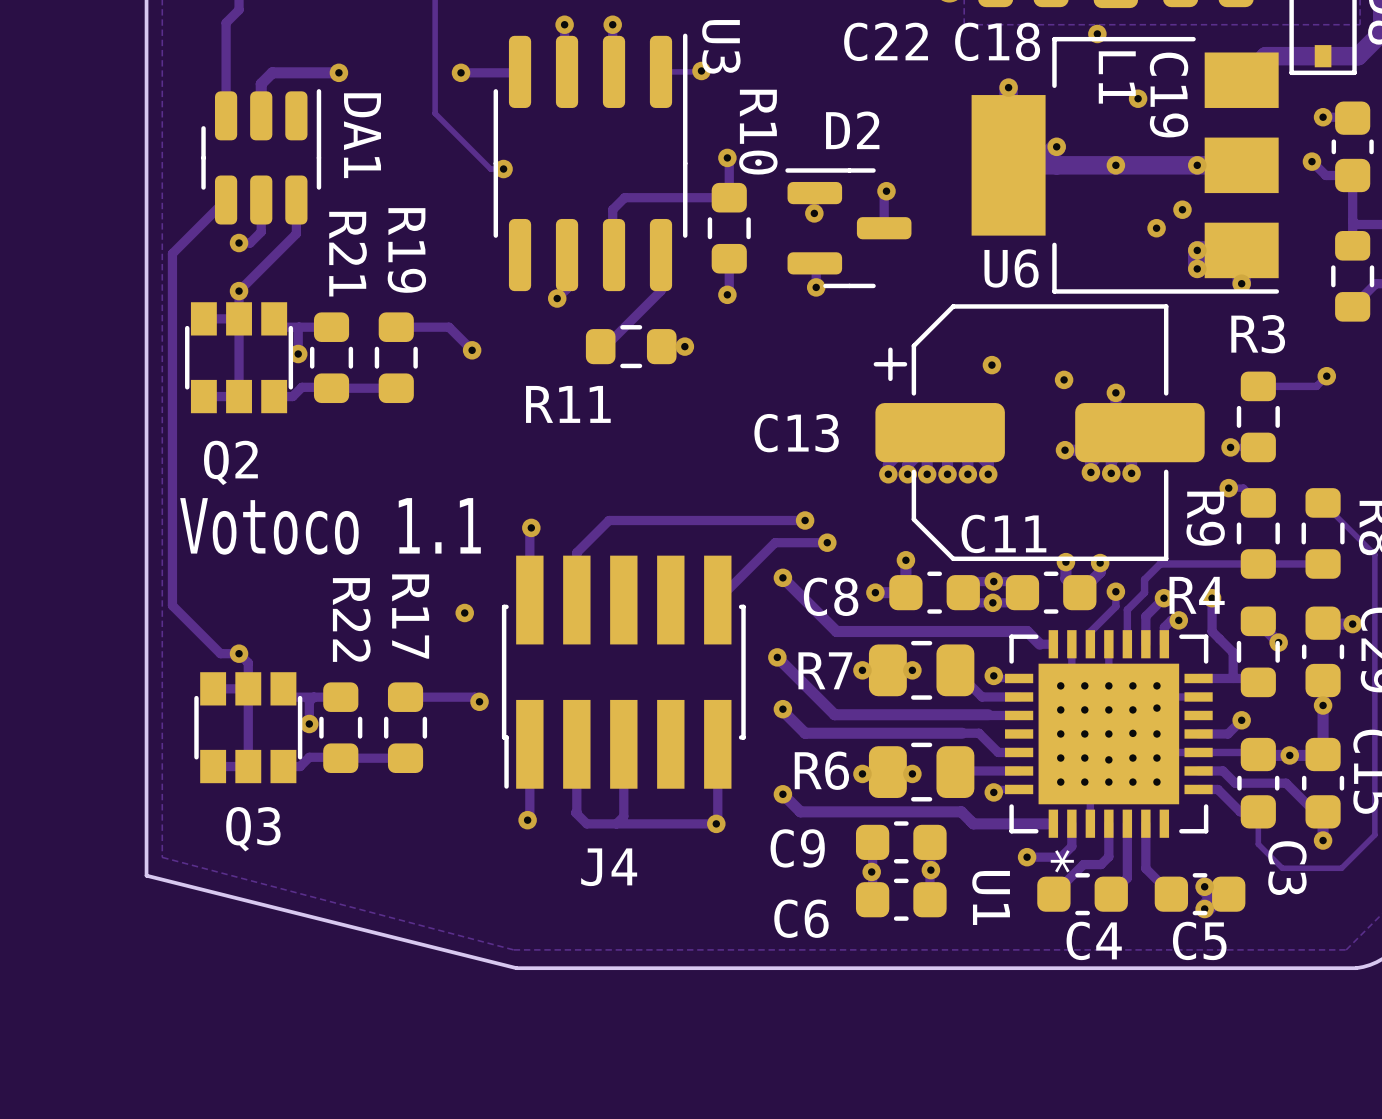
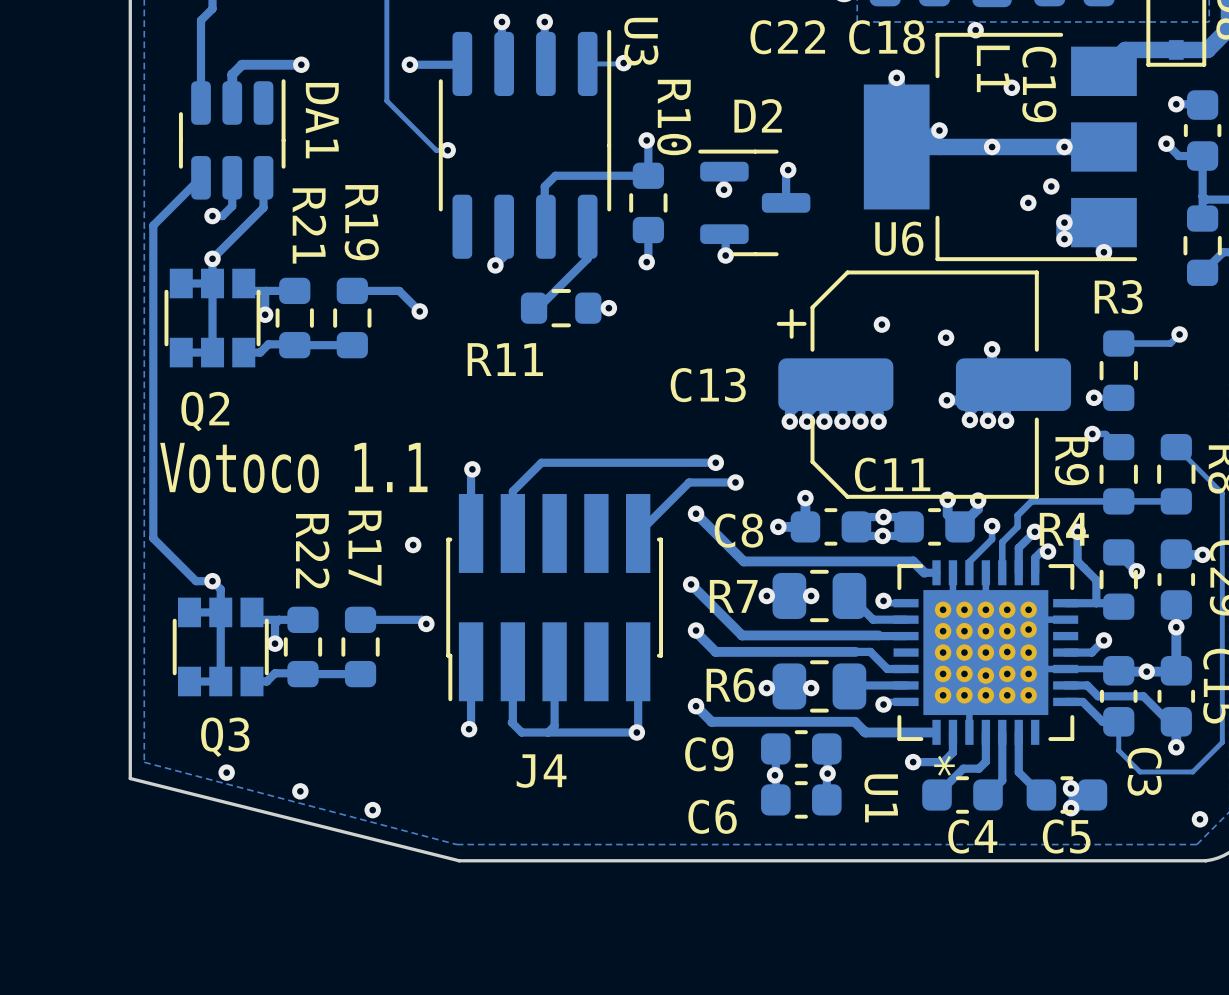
via: none -> (226, 772)
via: none -> (300, 791)
via: none -> (372, 810)
via: none -> (1199, 819)

